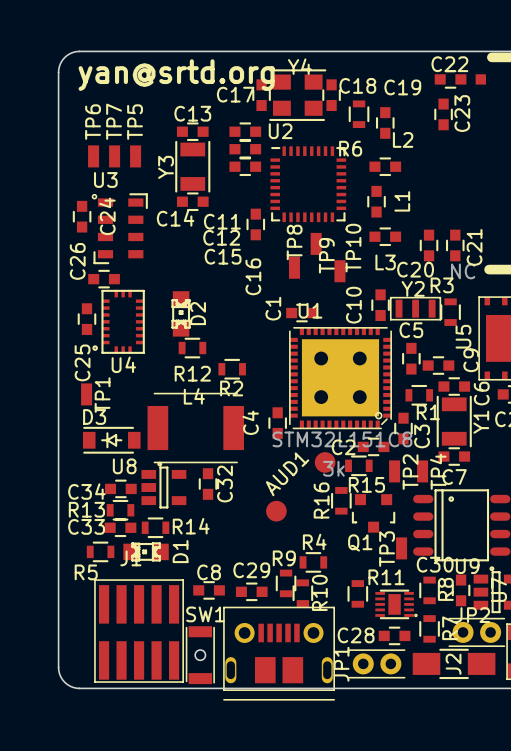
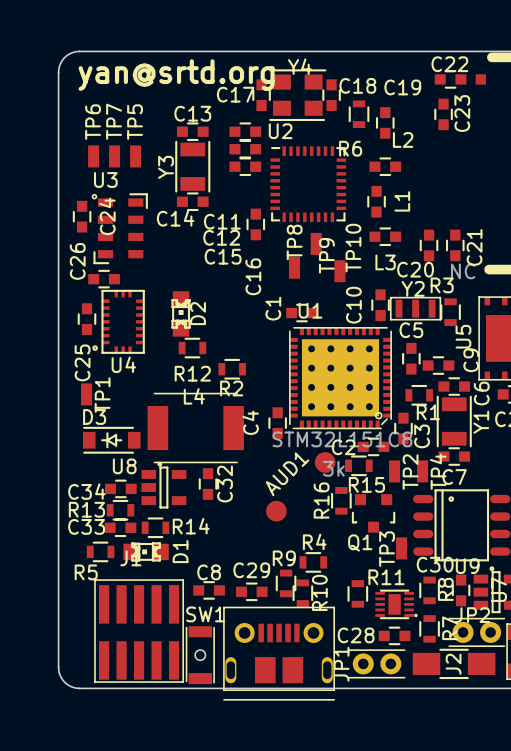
U1 footprint: [289, 327, 392, 430] -> [289, 327, 392, 430]

